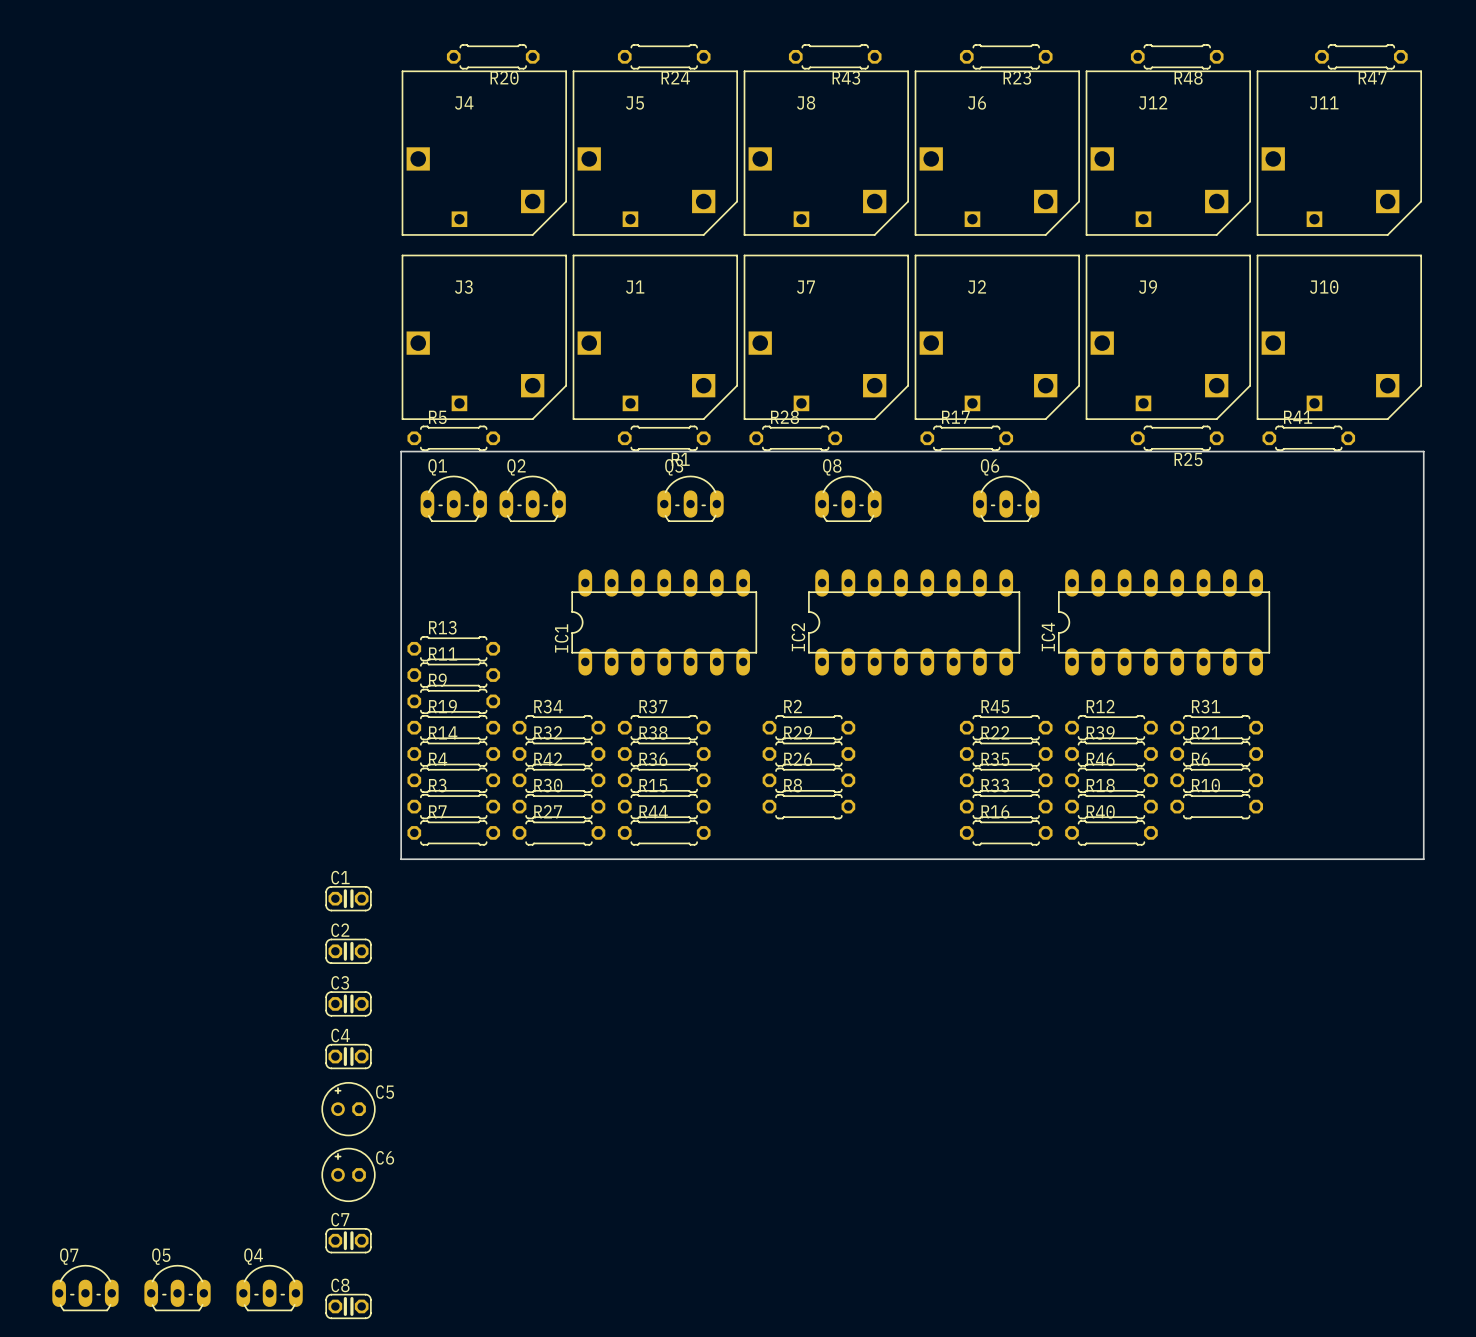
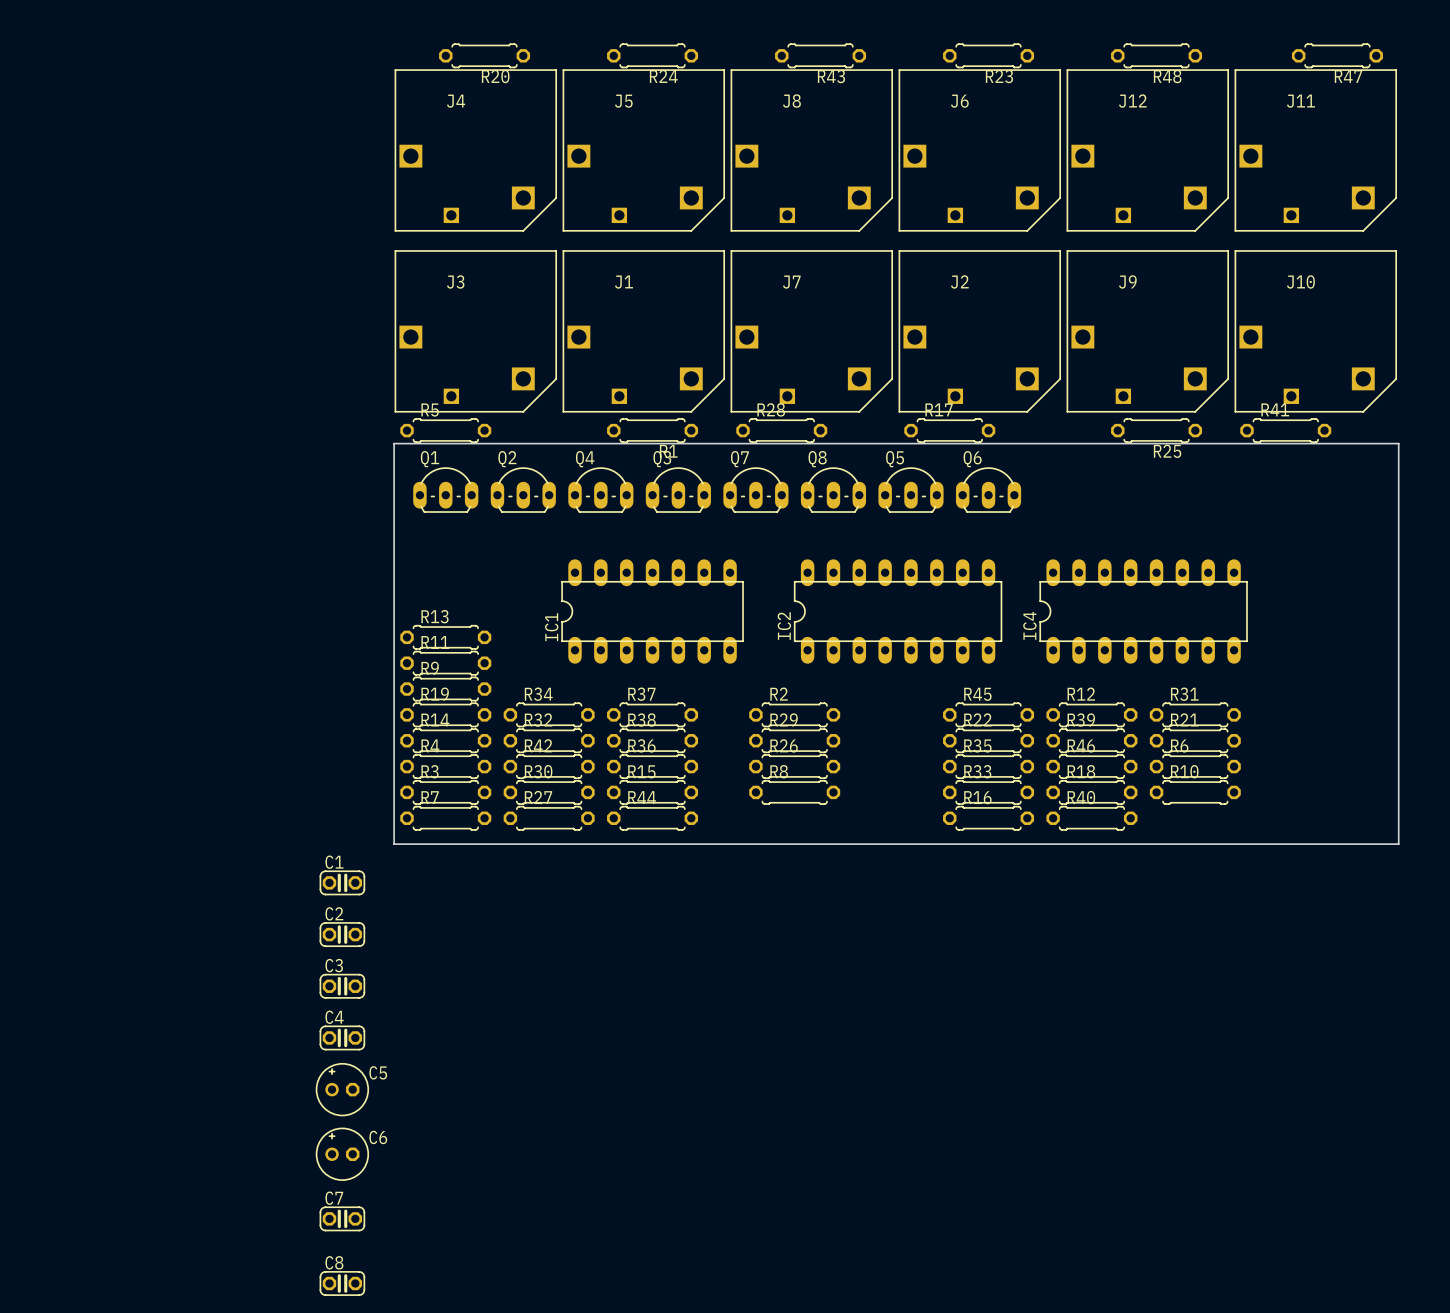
Q7 position: (85, 1288) -> (755, 490)
Q5 position: (177, 1288) -> (911, 490)
Q4 position: (269, 1288) -> (600, 490)

